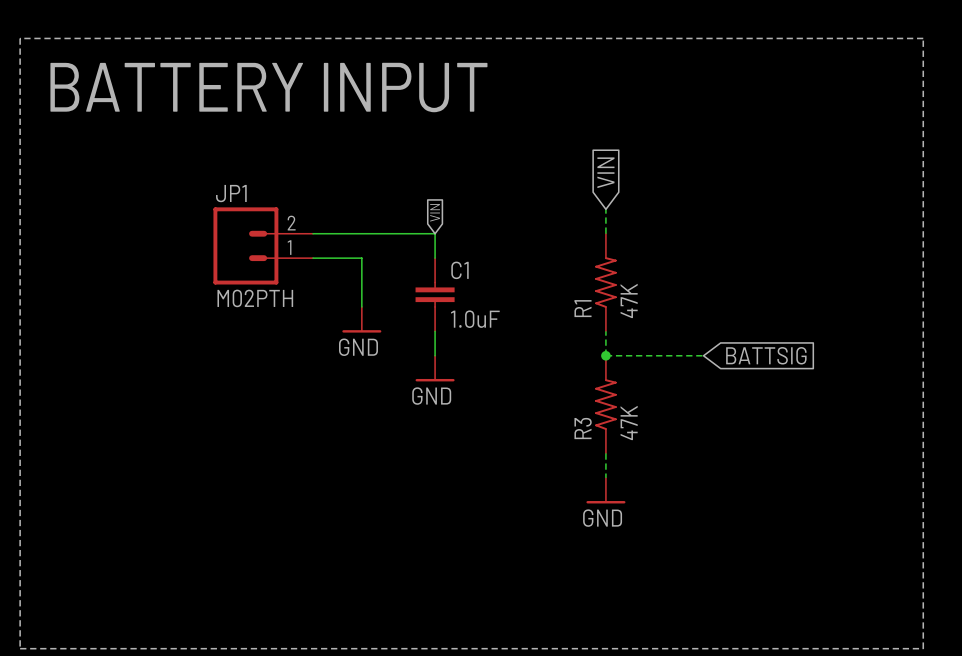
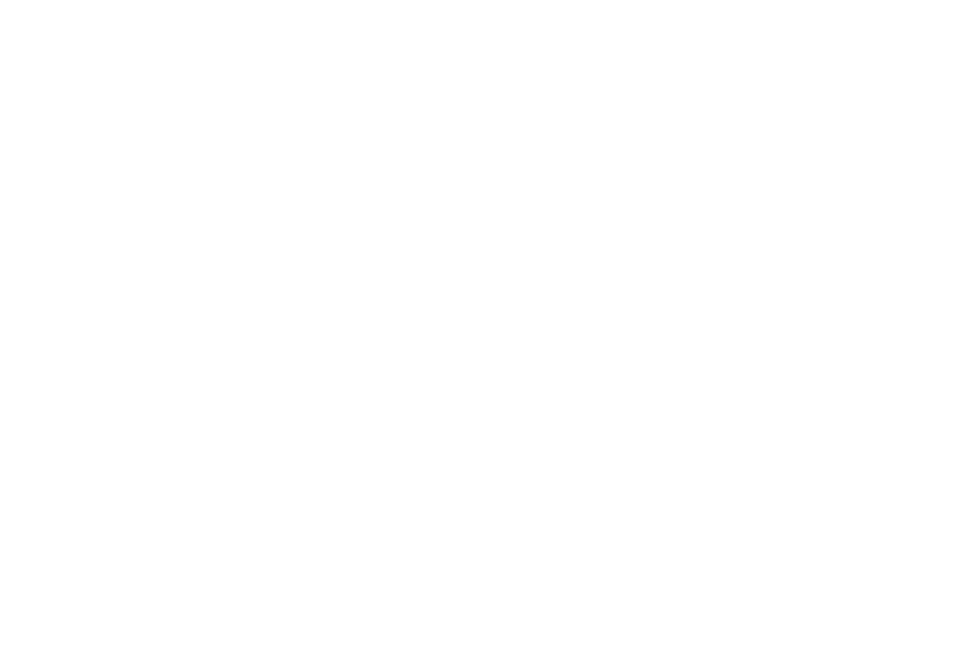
line: (20, 38) (20, 648) (923, 648) (923, 38) (20, 38) -> none
text: BATTERY INPUT (268, 87) -> none
global label: VIN (605, 172) -> none
wire: (605, 209) (605, 233) -> none
global label: VIN (435, 212) -> none
wire: (313, 233) (435, 233) (435, 258) -> none
JP1: M02PTH (263, 245) -> none
wire: (313, 258) (361, 258) (361, 306) -> none
R1: 47K (605, 282) -> none
C1: 1.0uF (435, 294) -> none
power symbol: GND (361, 319) -> none
wire: (435, 331) (435, 355) -> none
wire: (605, 331) (605, 355) (703, 355) -> none
junction: (605, 355) -> none
global label: BATTSIG (766, 355) -> none
power symbol: GND (435, 368) -> none
R3: 47K (605, 404) -> none
wire: (605, 453) (605, 477) -> none
power symbol: GND (605, 490) -> none

